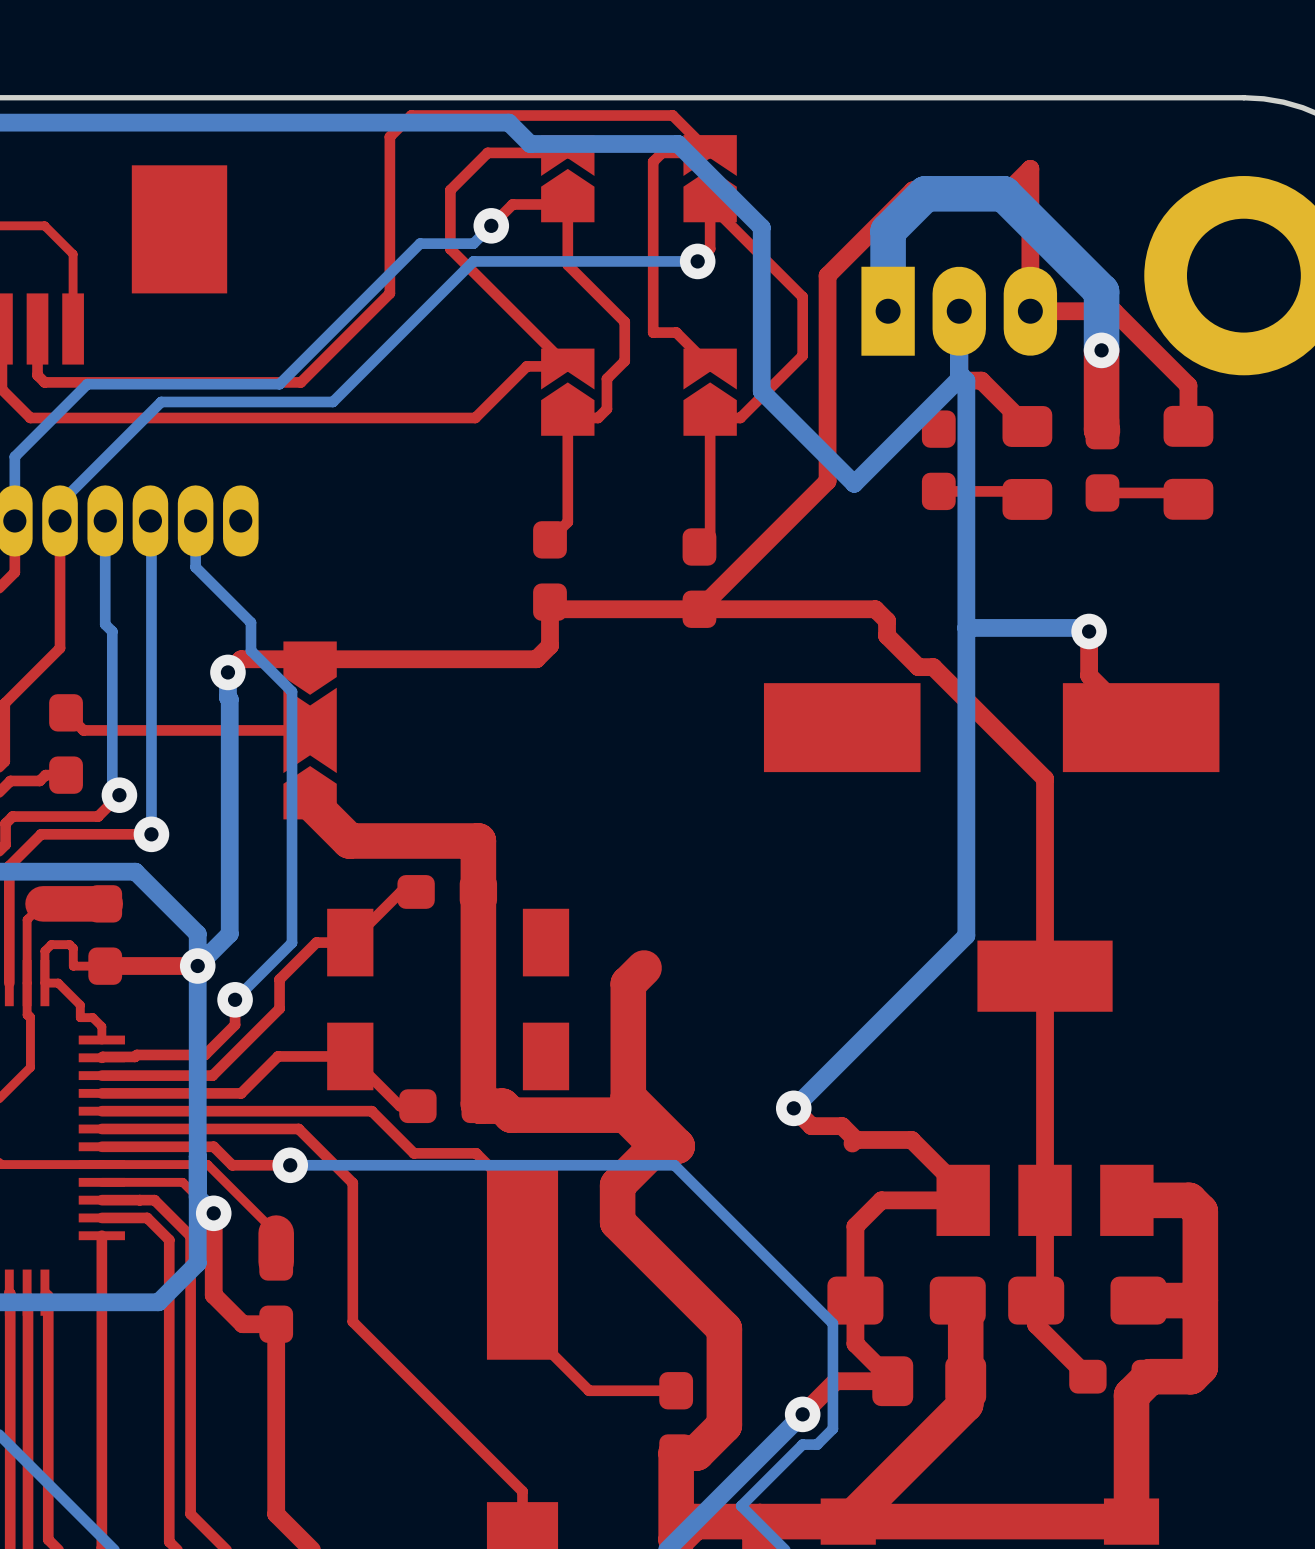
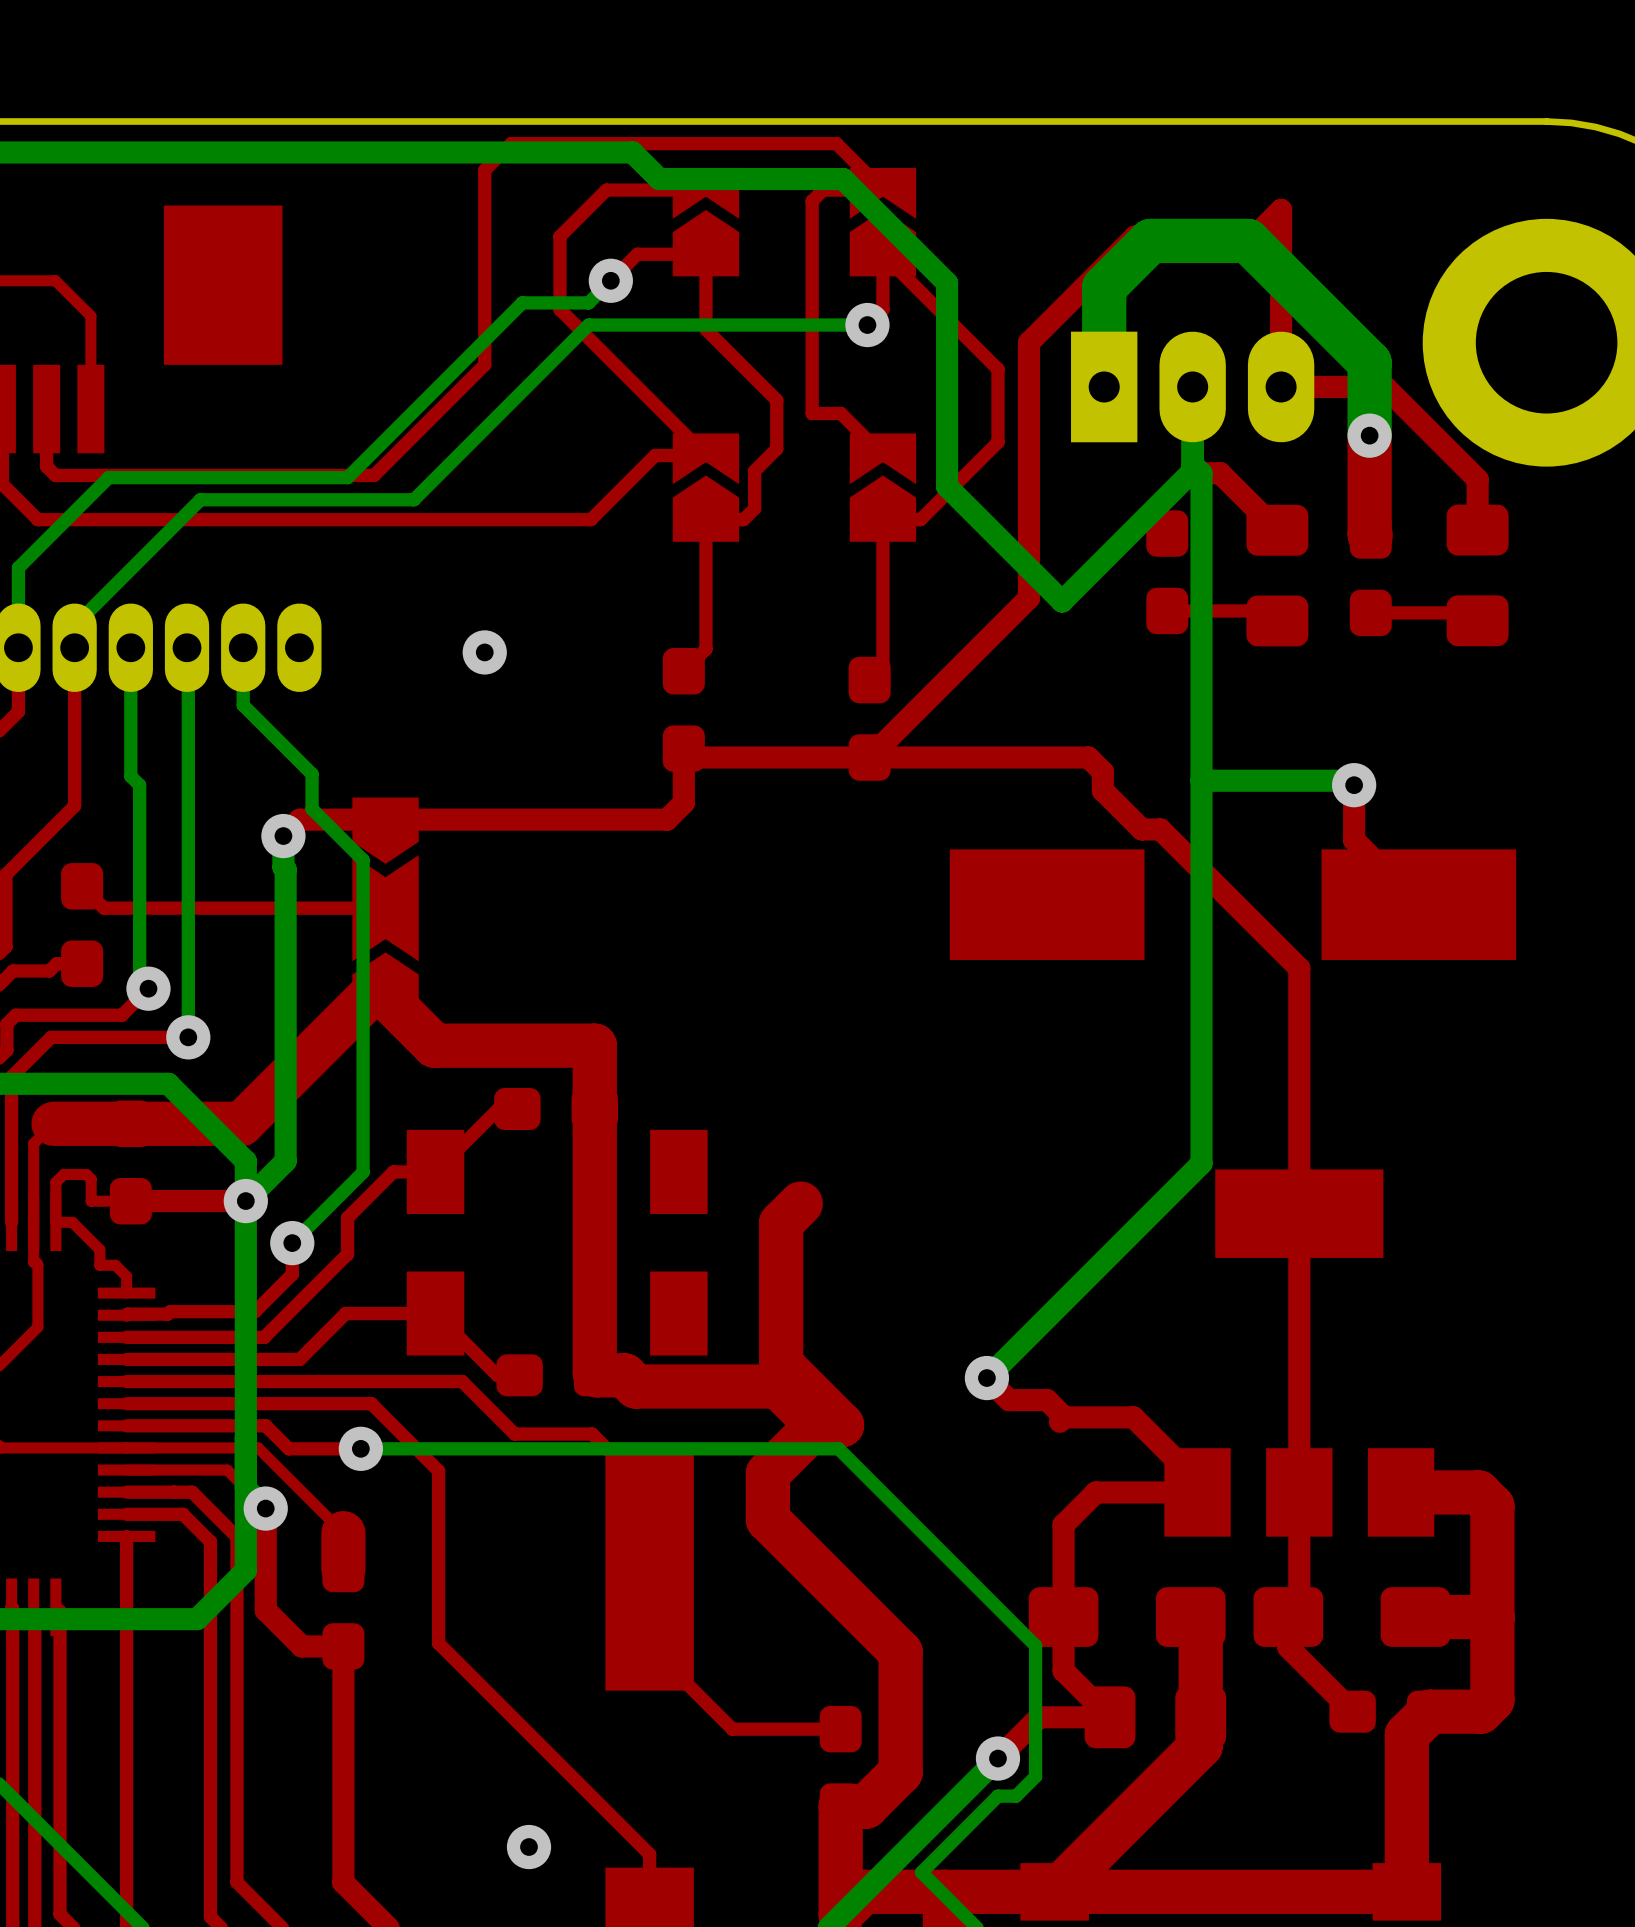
via: none -> (484, 652)
top track: none -> (385, 996) (368, 996) (241, 1123) (130, 1123)
via: none -> (528, 1847)

